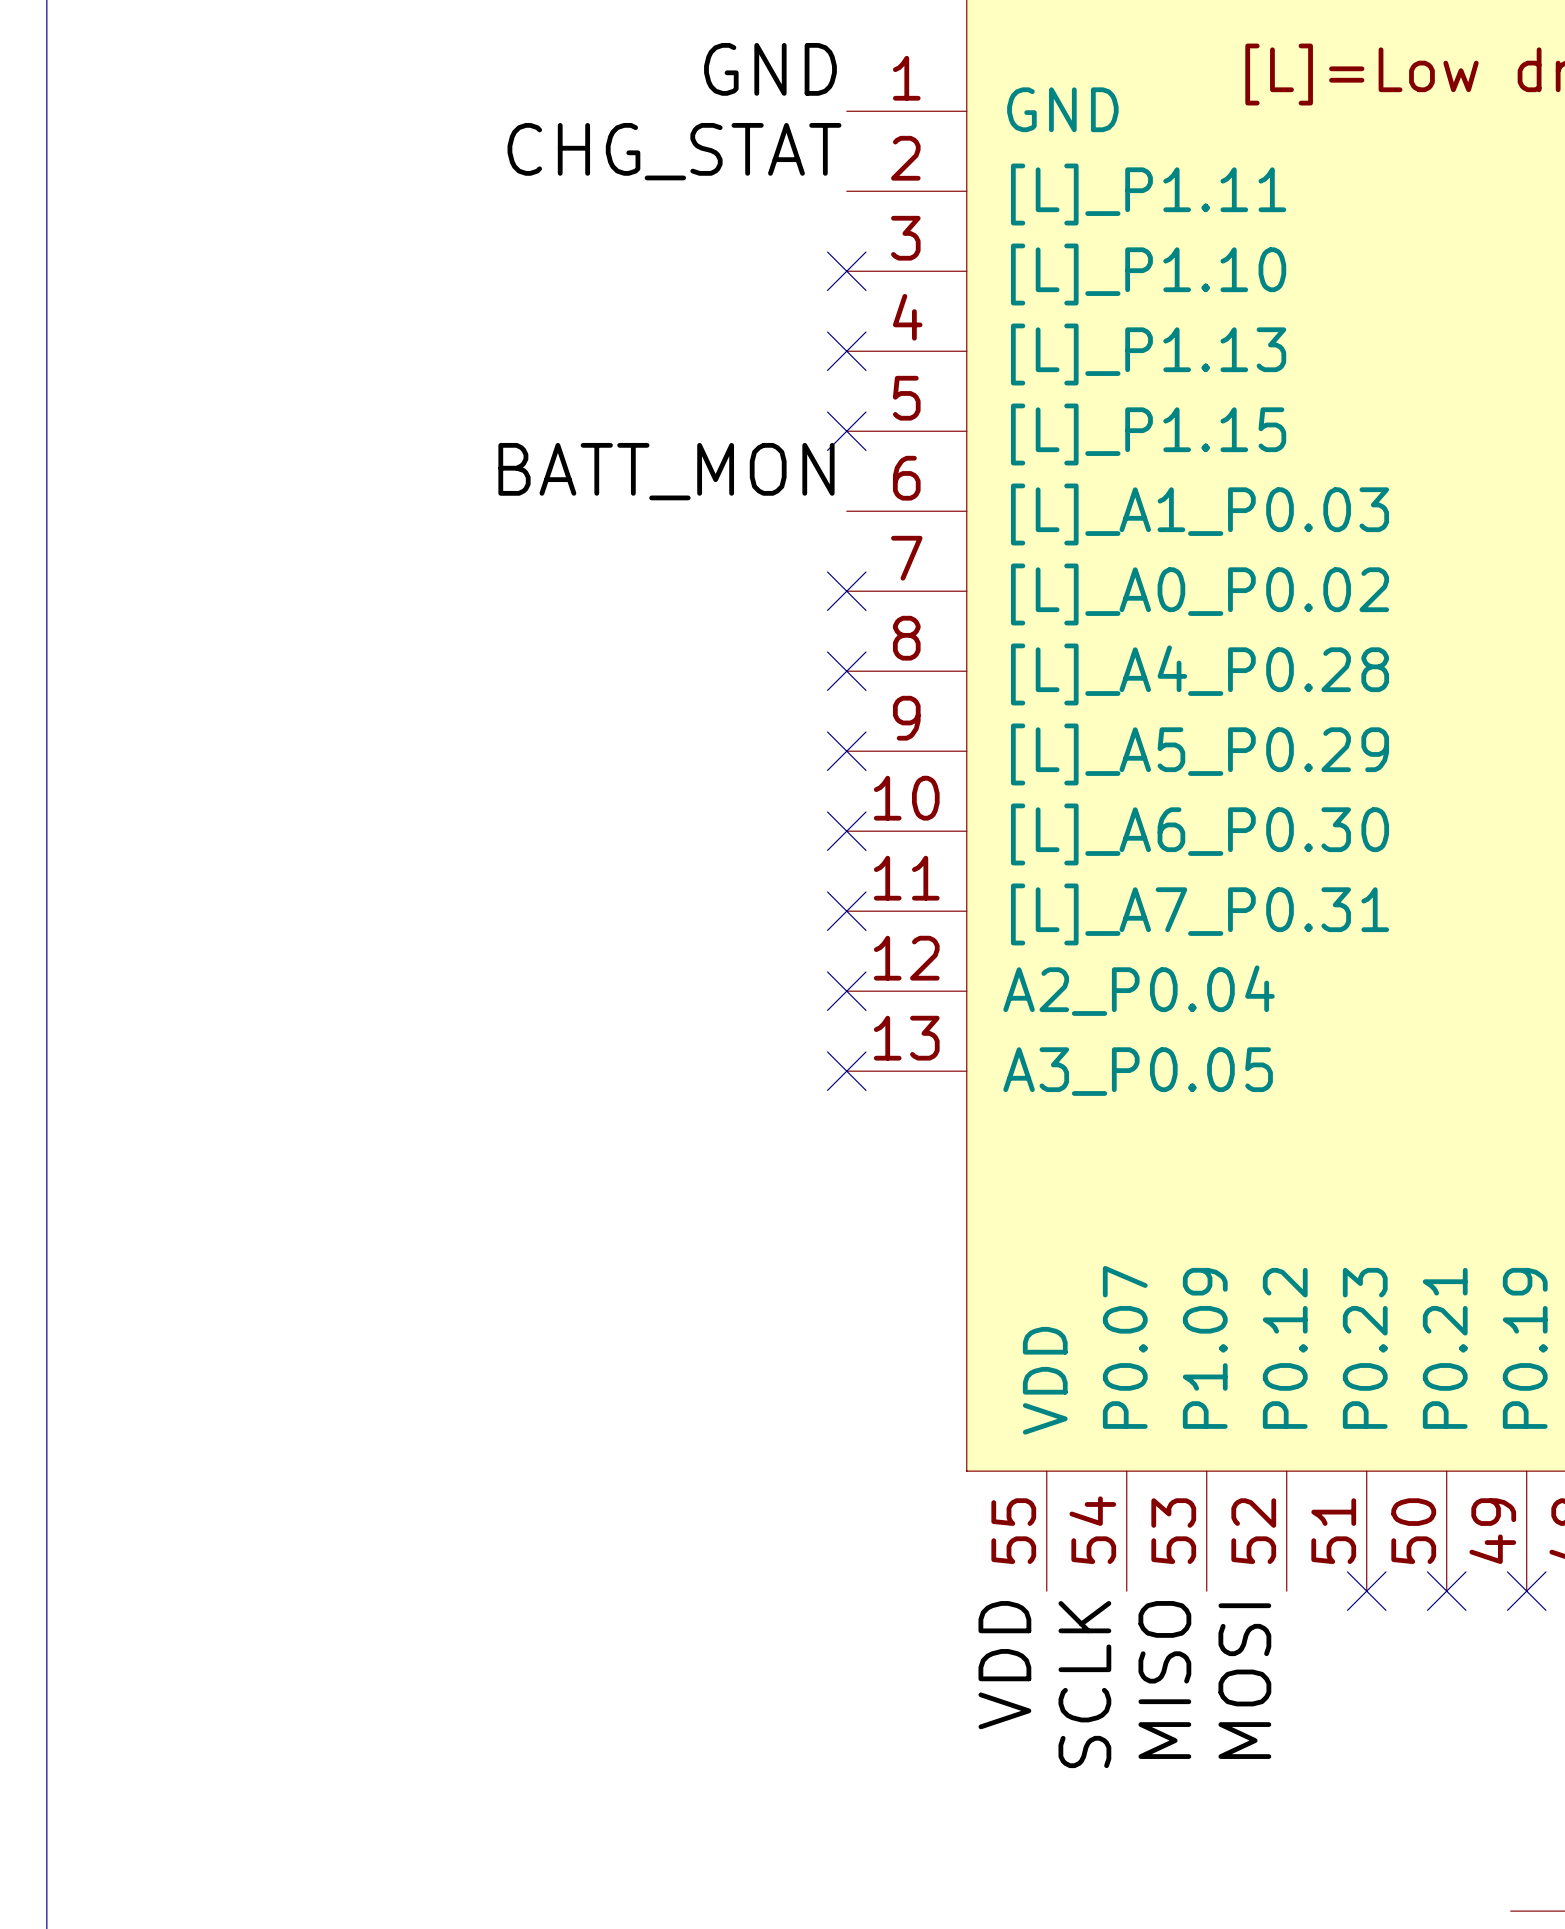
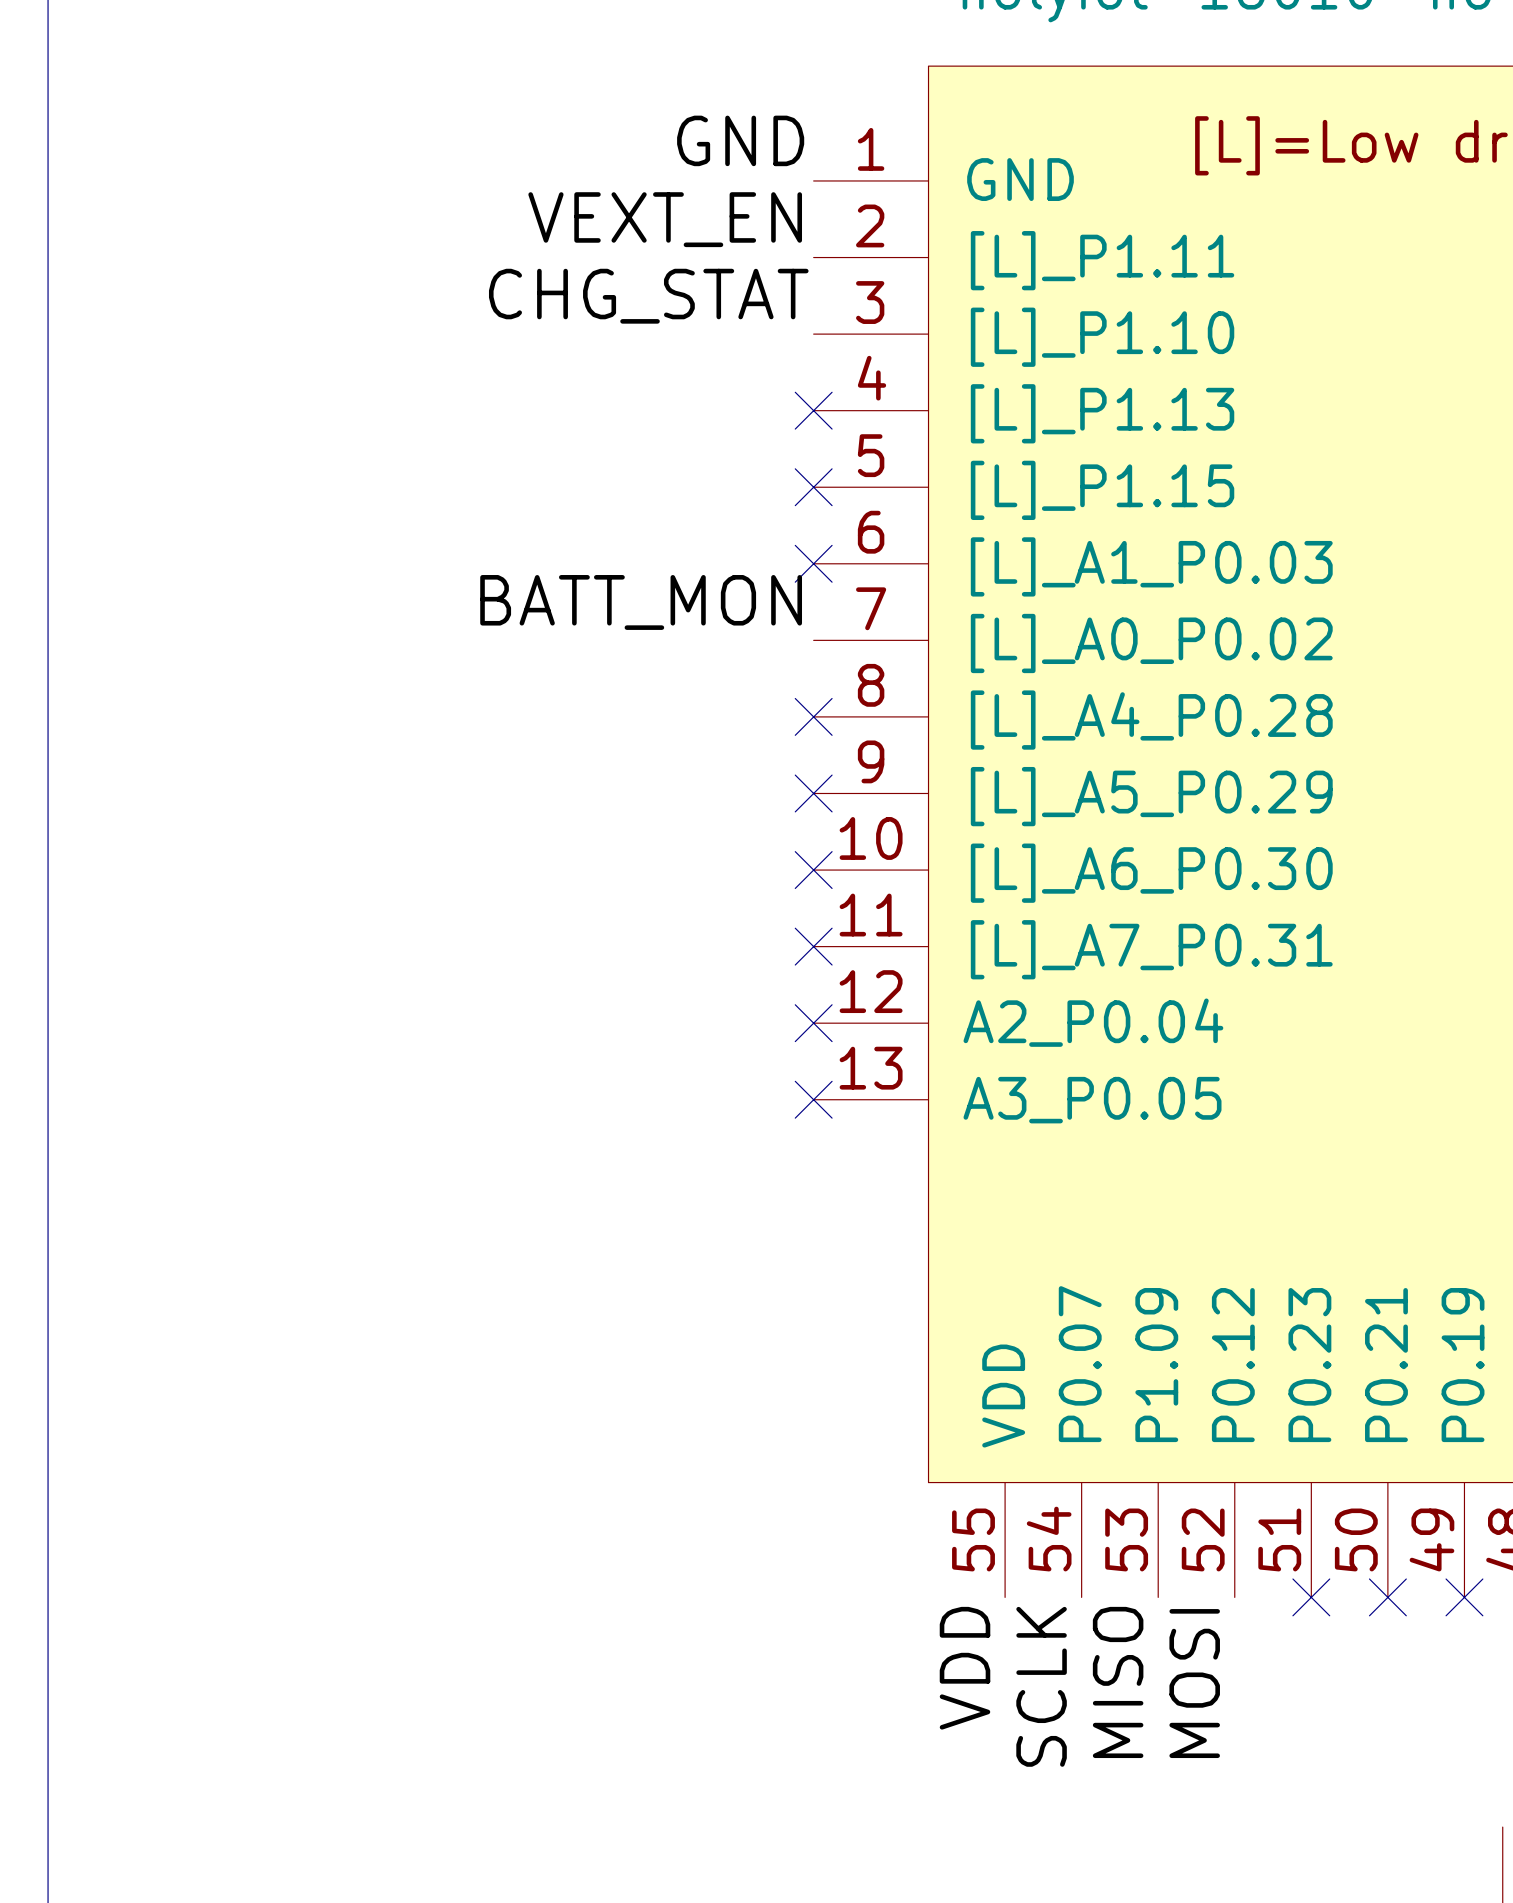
label: CHG_STAT (674, 151) -> VEXT_EN (665, 219)
label: none -> CHG_STAT (648, 296)
no-connect mark: (846, 271) -> none
label position: BATT_MON (666, 471) -> BATT_MON (641, 602)
no-connect mark position: (846, 591) -> (813, 563)

